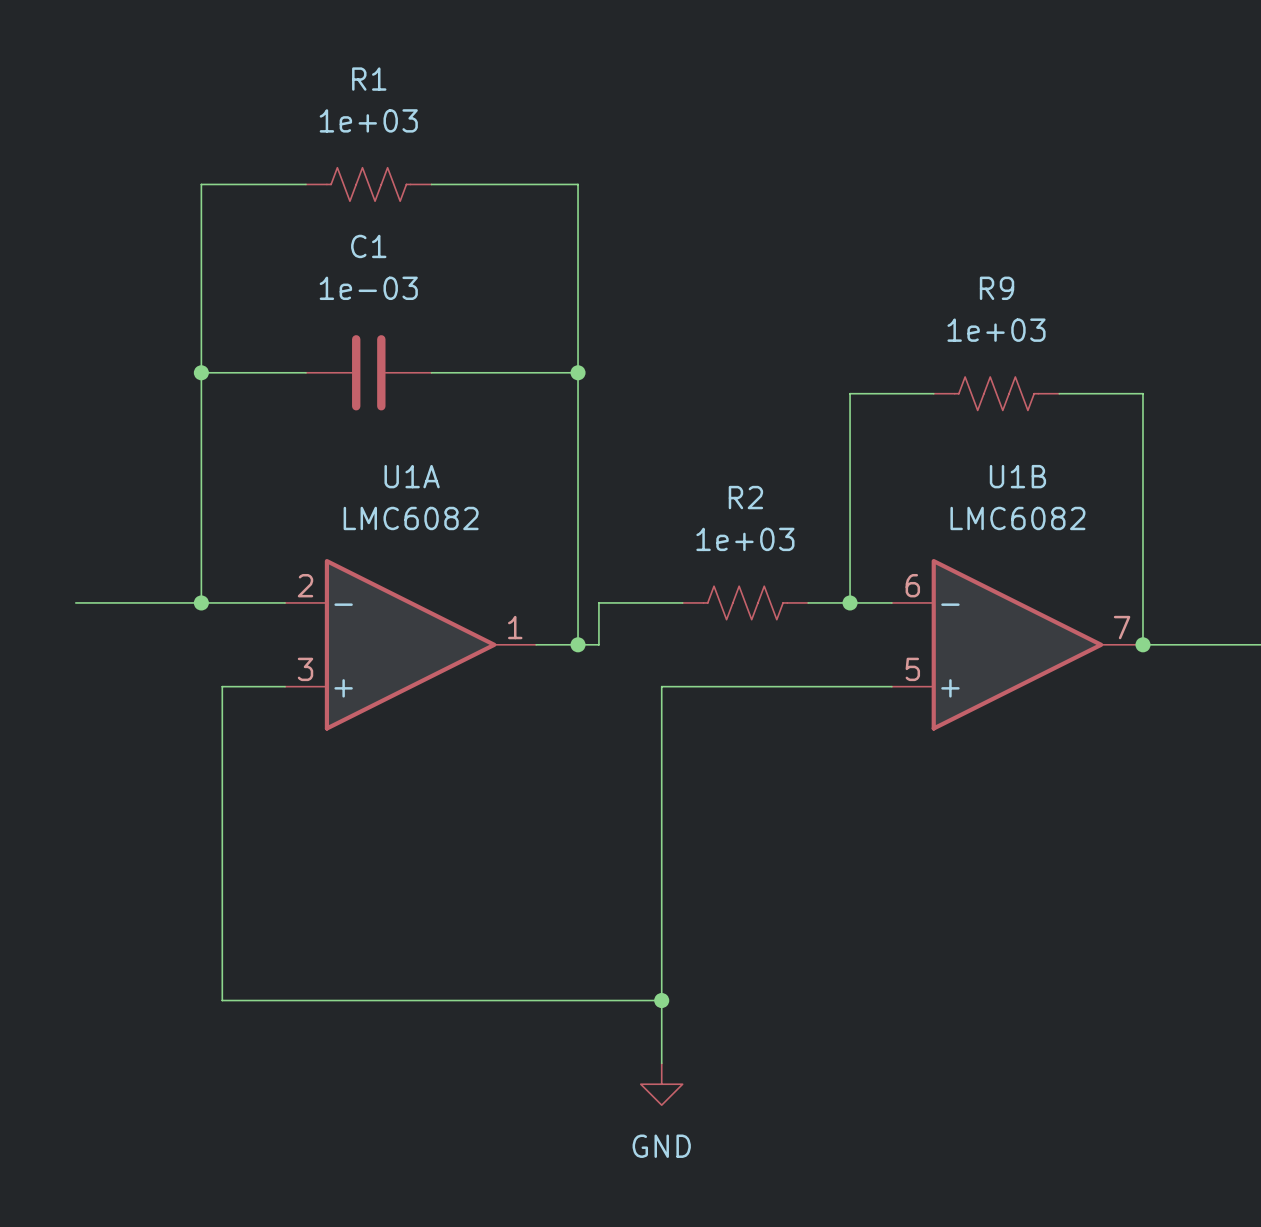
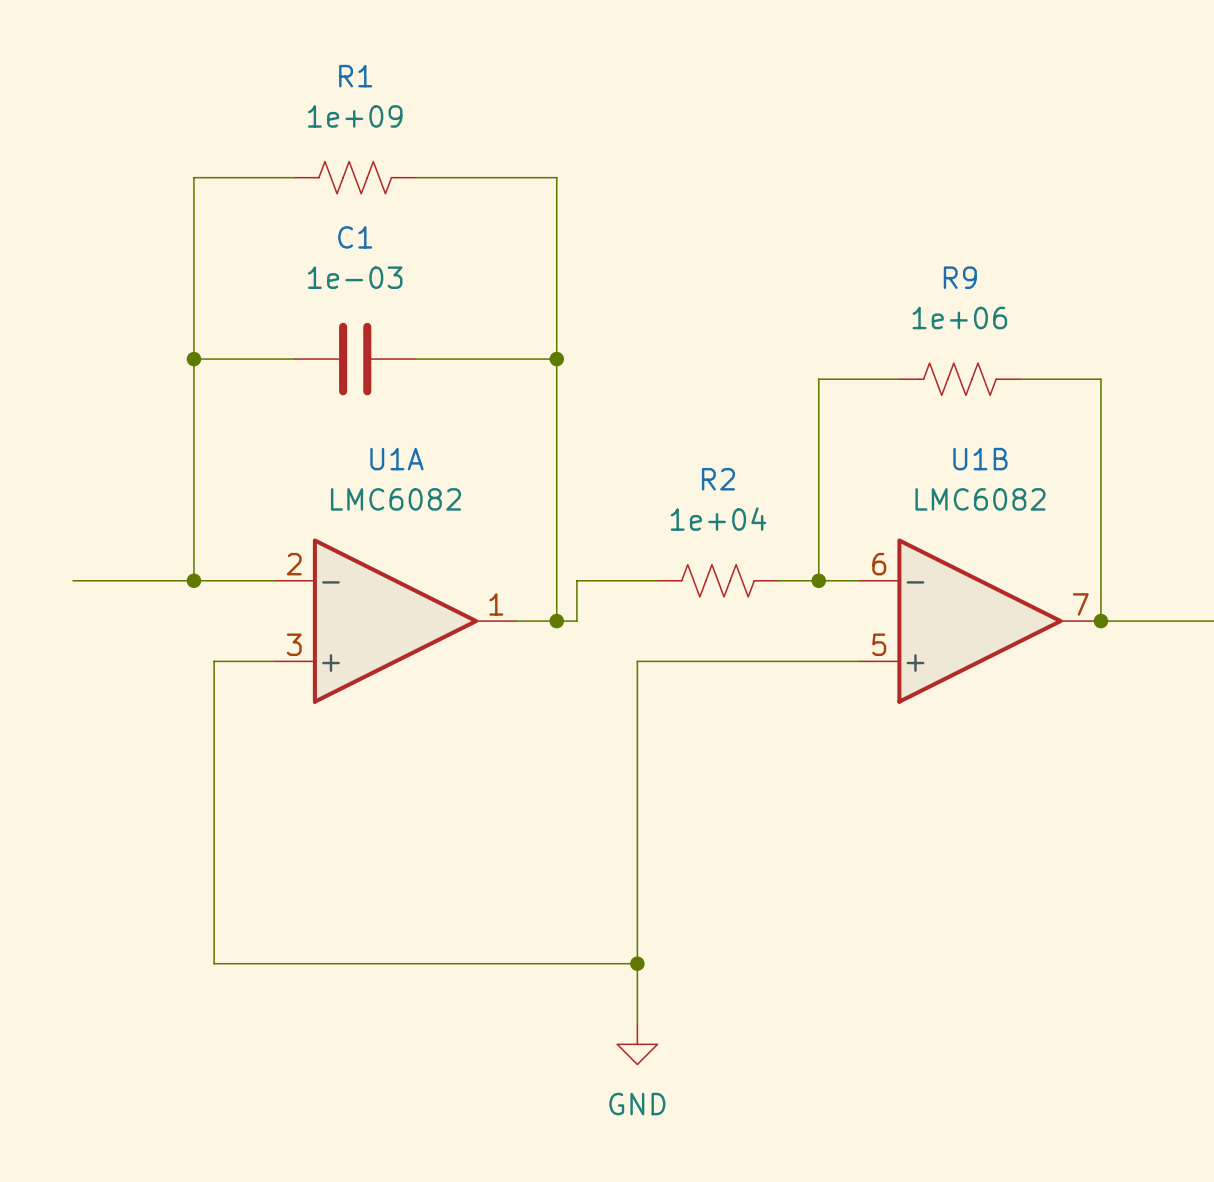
R1 value: 1e+03 (368, 120) -> 1e+09 (355, 116)
R9 value: 1e+03 (996, 330) -> 1e+06 (959, 318)
R2 value: 1e+03 (745, 539) -> 1e+04 (718, 519)

